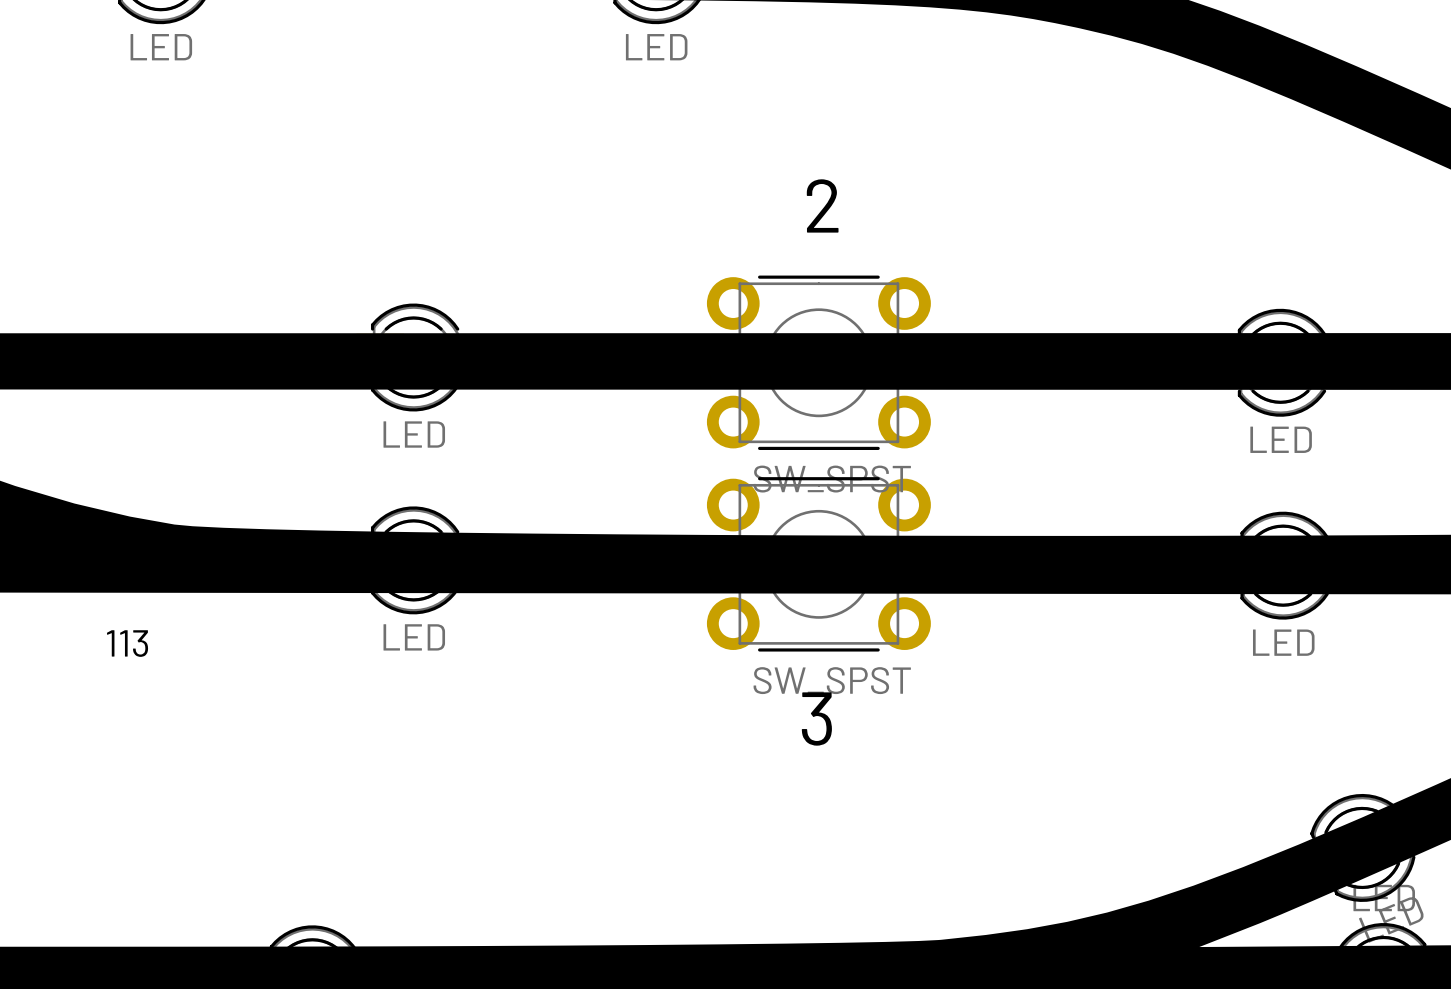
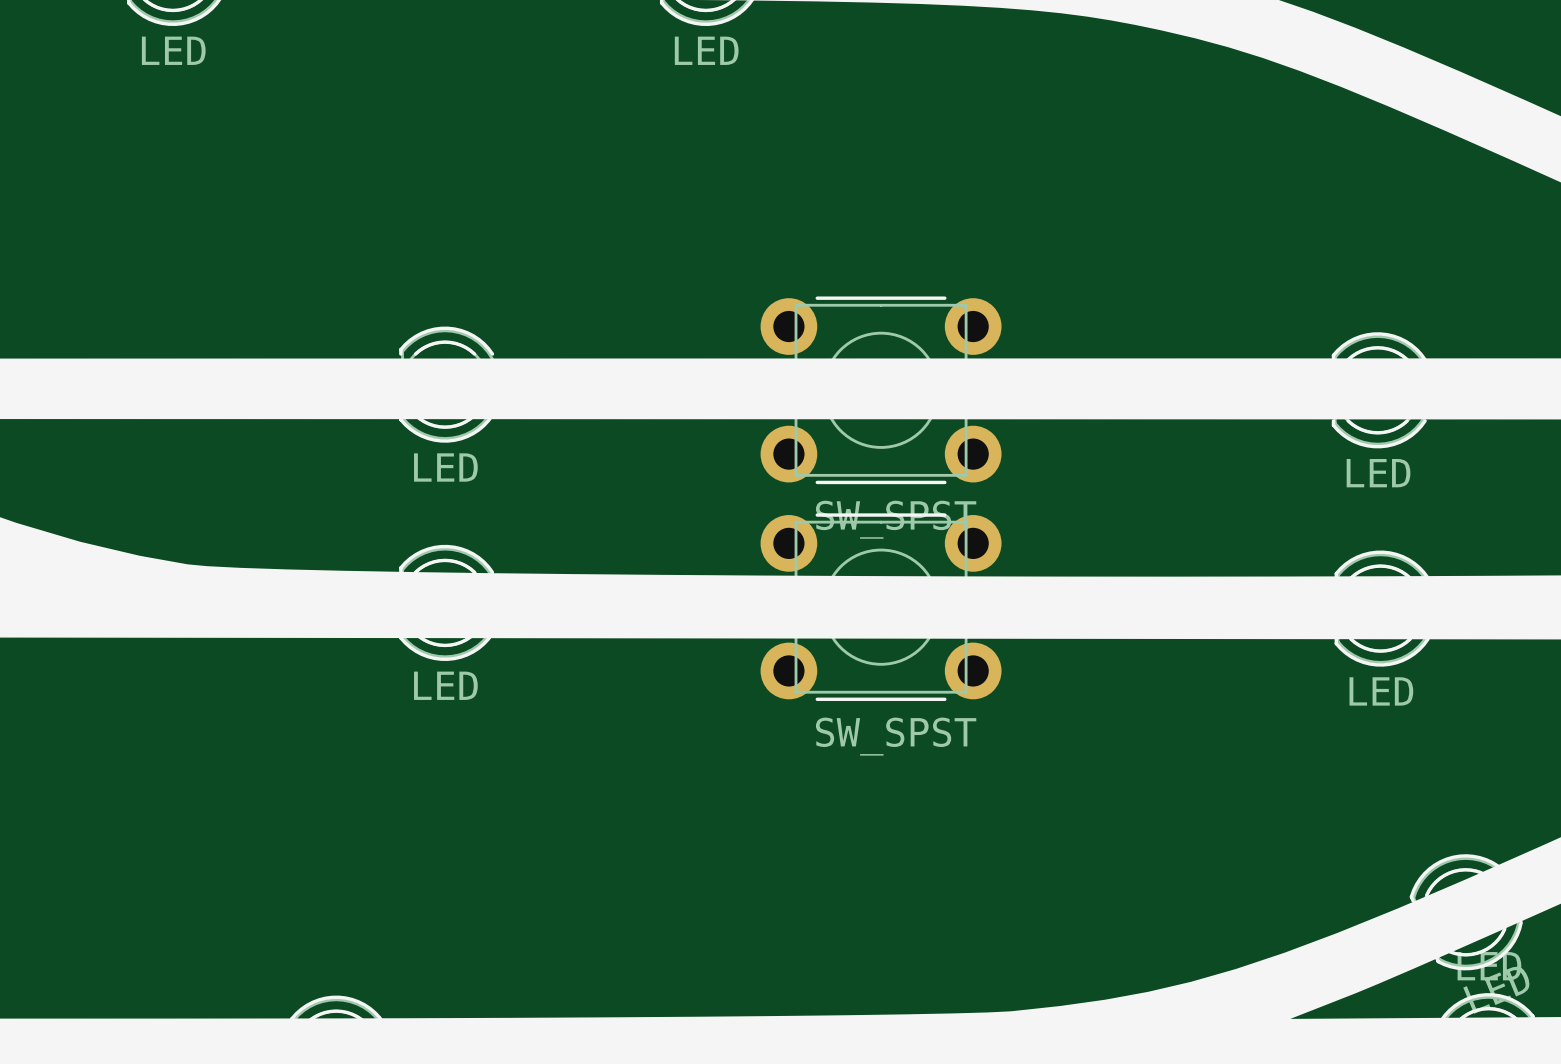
text: 2 (822, 205) -> none
text: 113 (127, 643) -> none
text: 3 (816, 719) -> none

